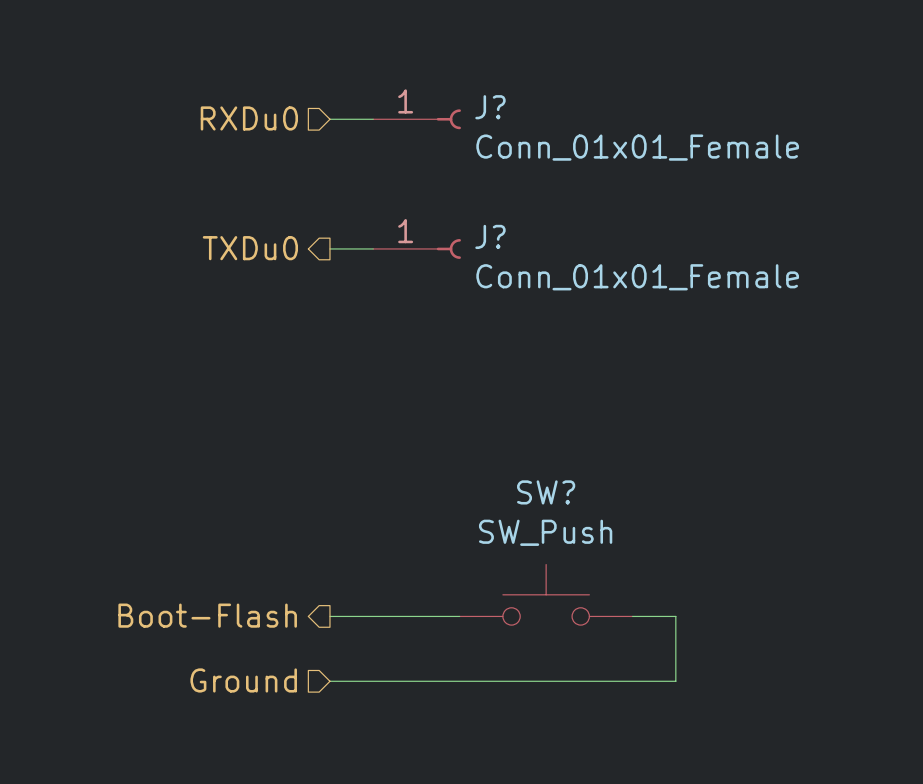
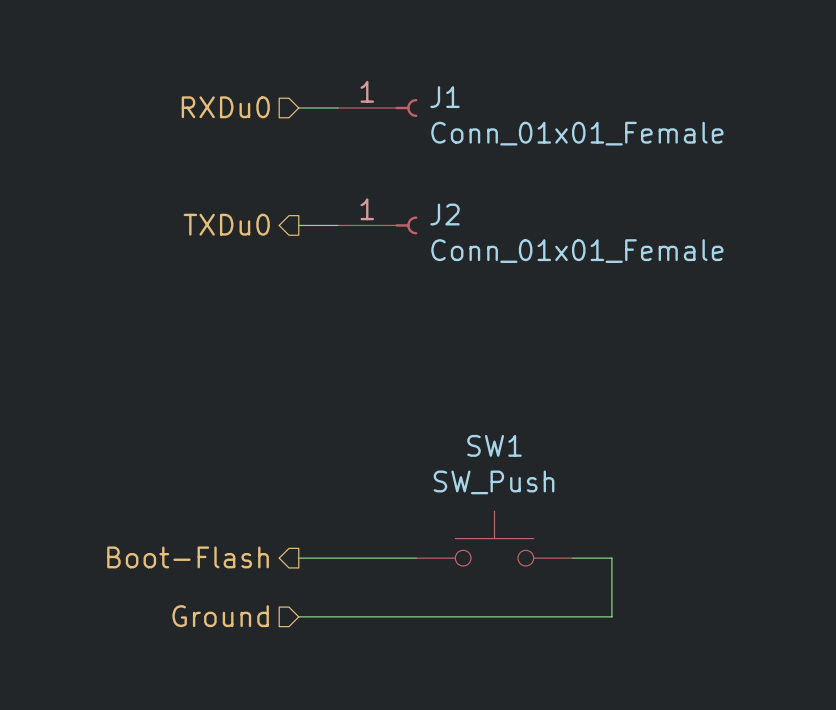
J? name: J? (490, 107) -> J1 (445, 97)
J? name: J? (490, 236) -> J2 (445, 214)
SW? name: SW? (546, 492) -> SW1 (494, 445)

